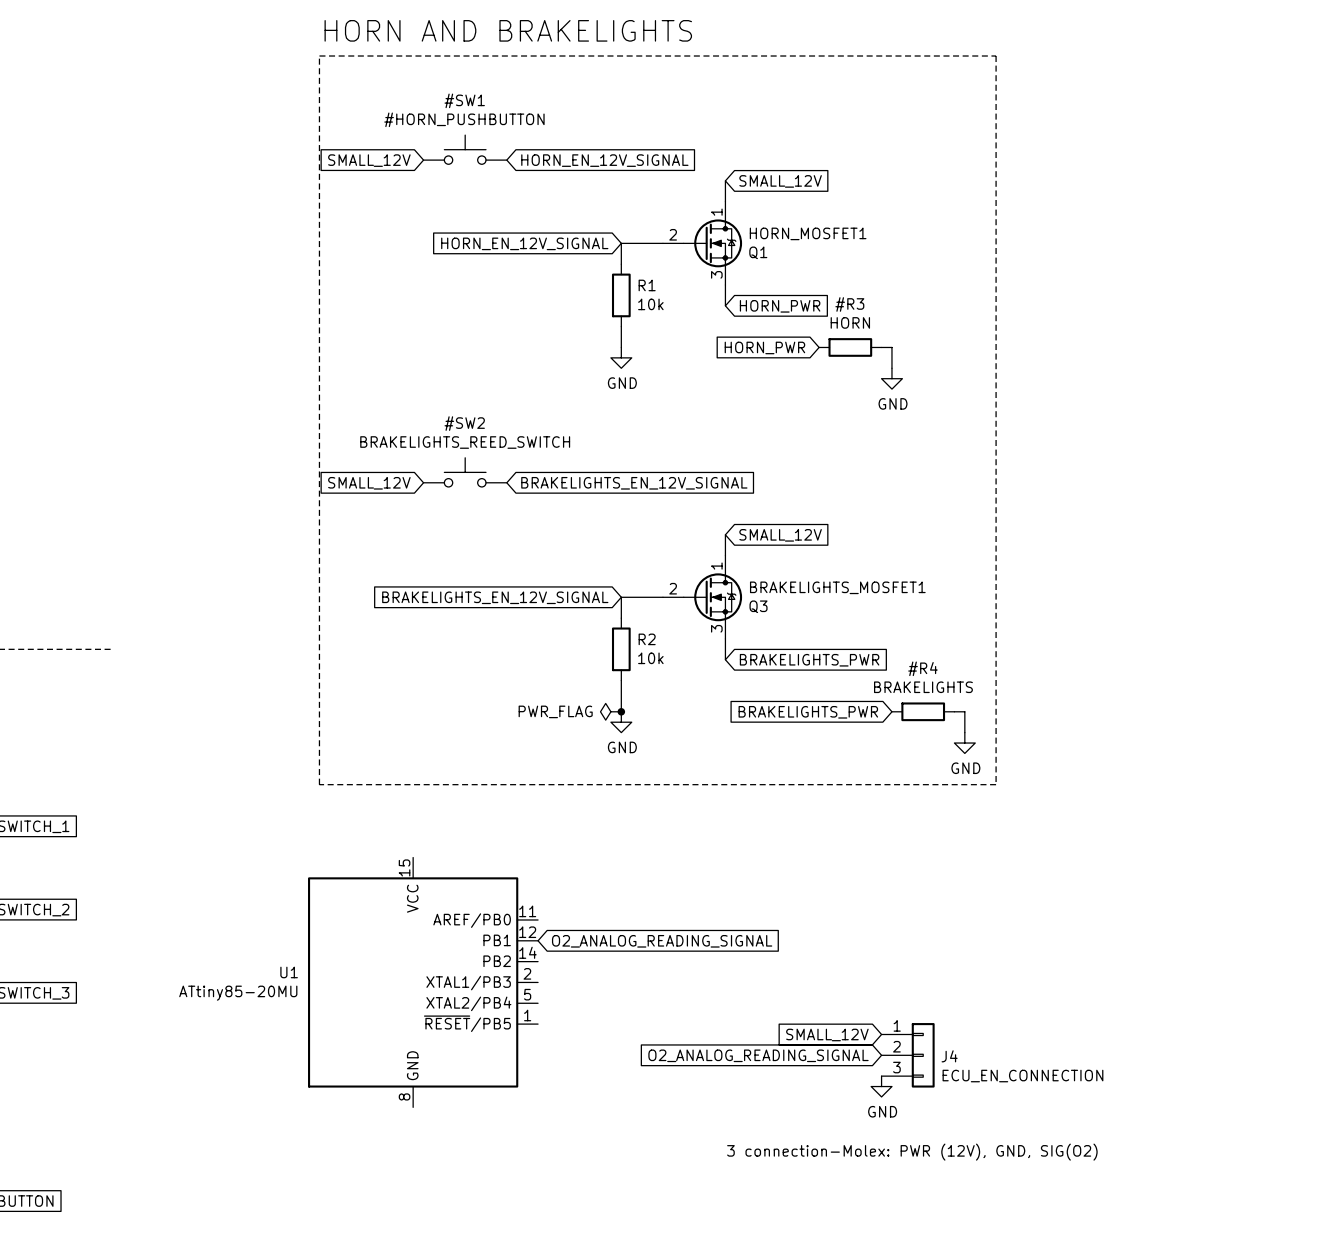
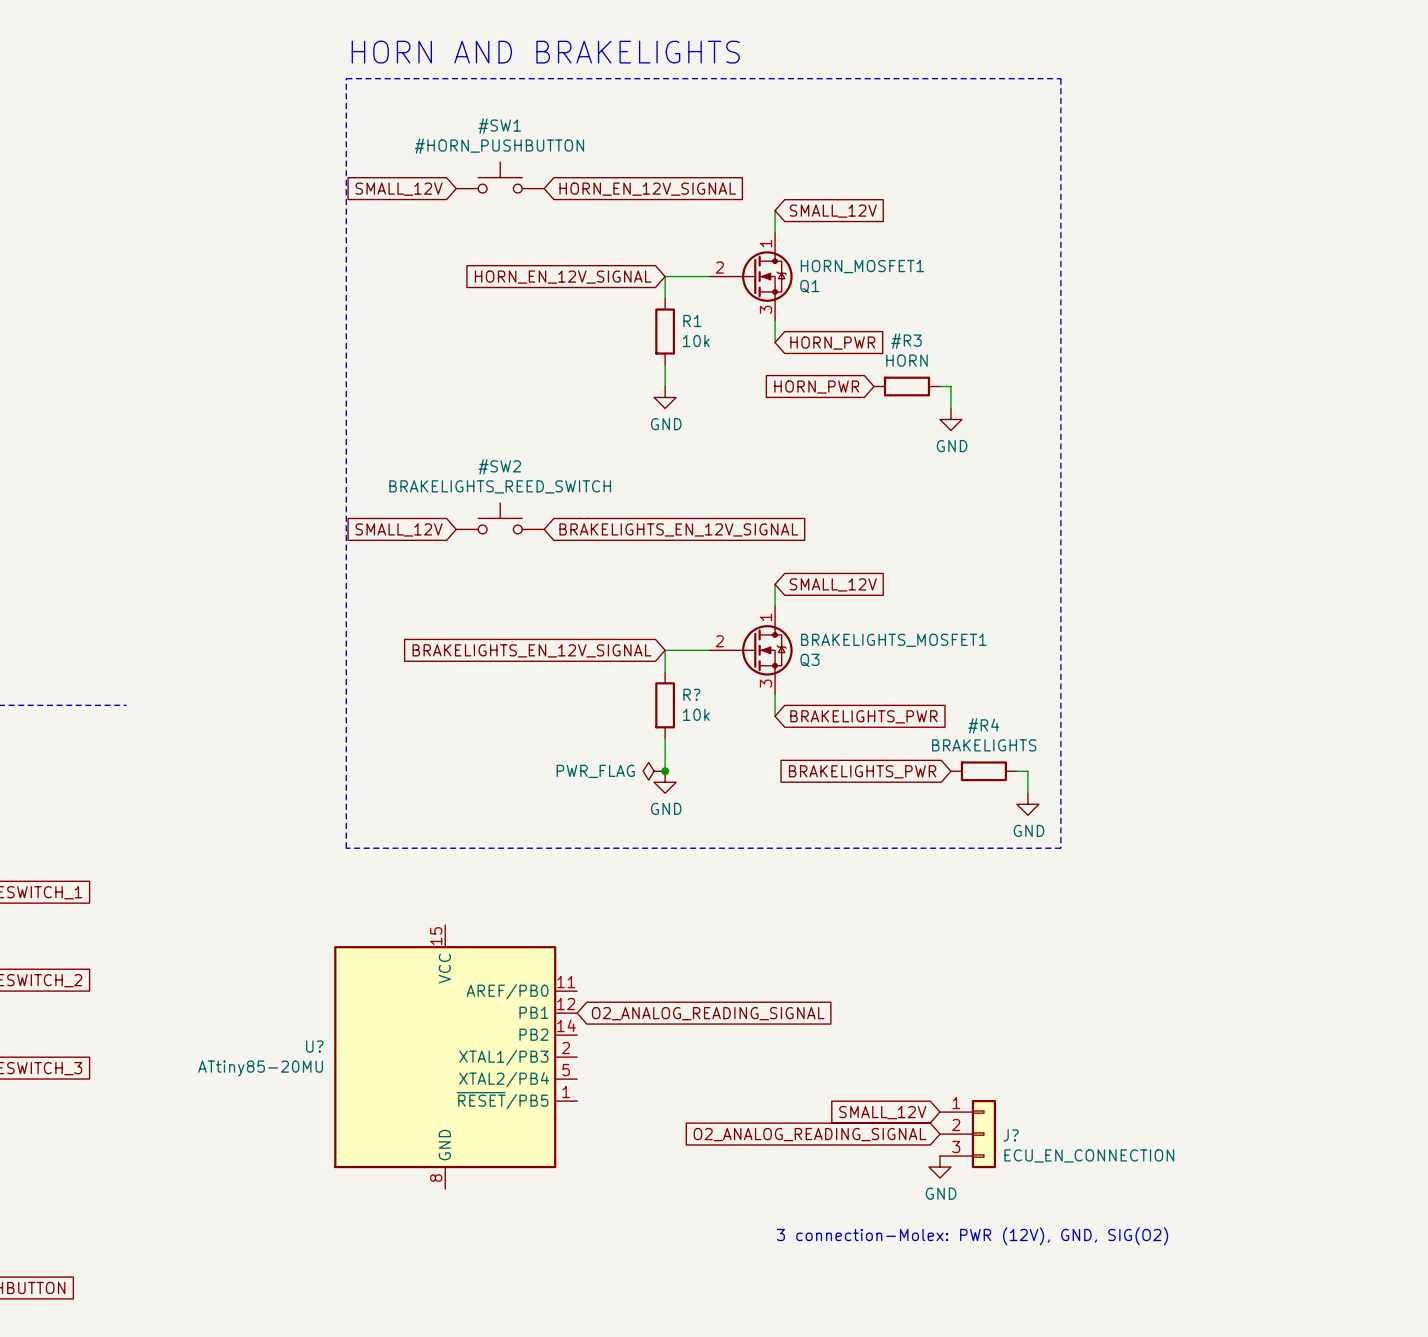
R2 name: R2 (647, 639) -> R? (691, 694)
U1 name: U1 (289, 972) -> U? (314, 1046)
J4 name: J4 (949, 1056) -> J? (1011, 1135)

